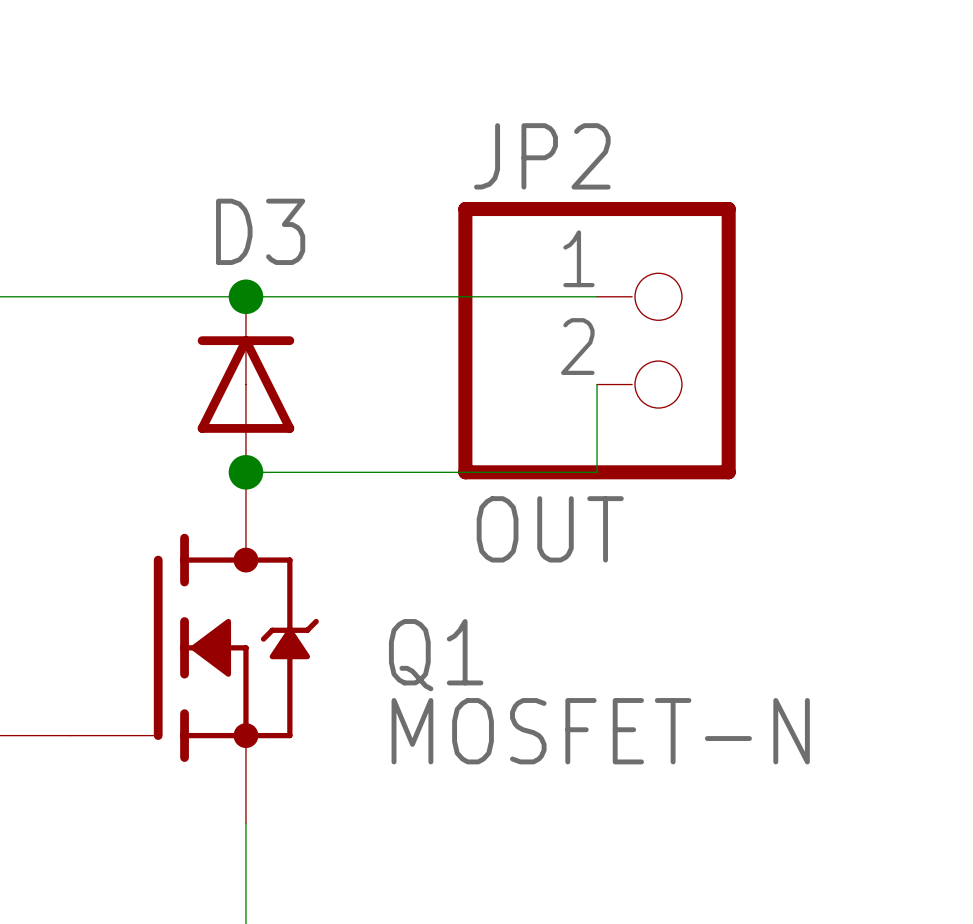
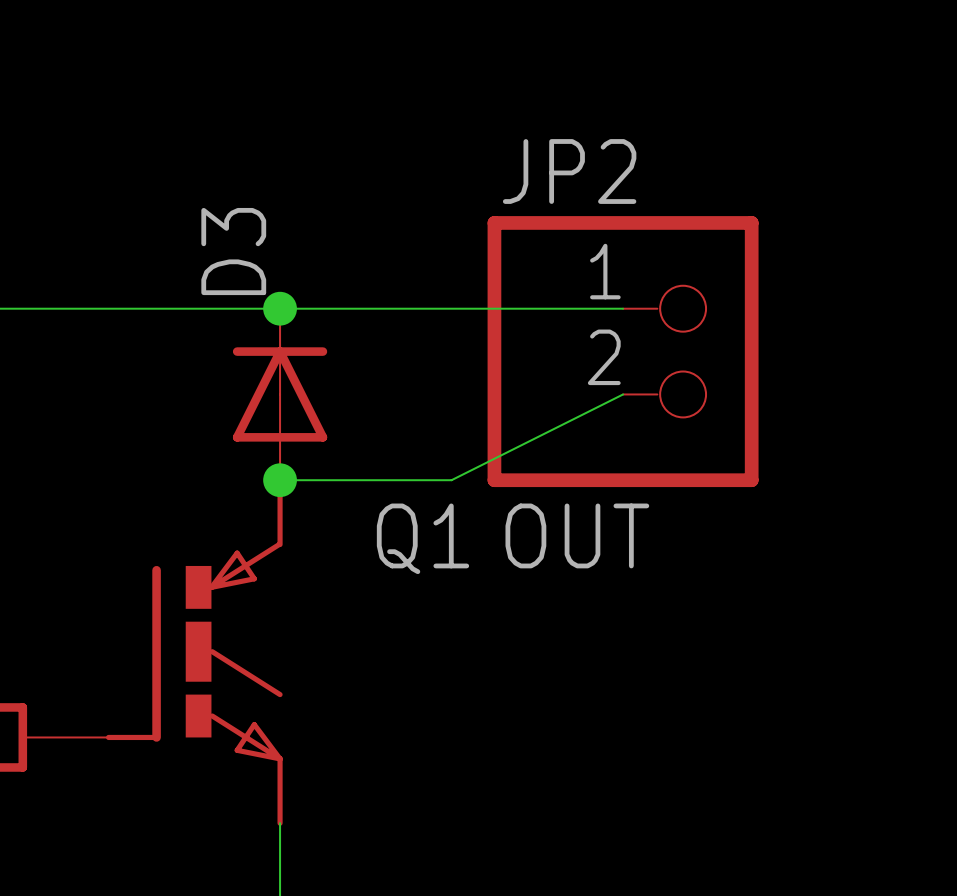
D3 name rotation: 0° (260, 231) -> 90° counterclockwise (233, 251)
wire: (597, 384) (597, 472) (421, 472) -> (623, 394) (451, 480)
Q1 symbol: [70, 472, 319, 824] -> [105, 477, 283, 826]
Q1 name position: Q1 (436, 655) -> Q1 (422, 538)
Q1 value: MOSFET-N (600, 731) -> none

